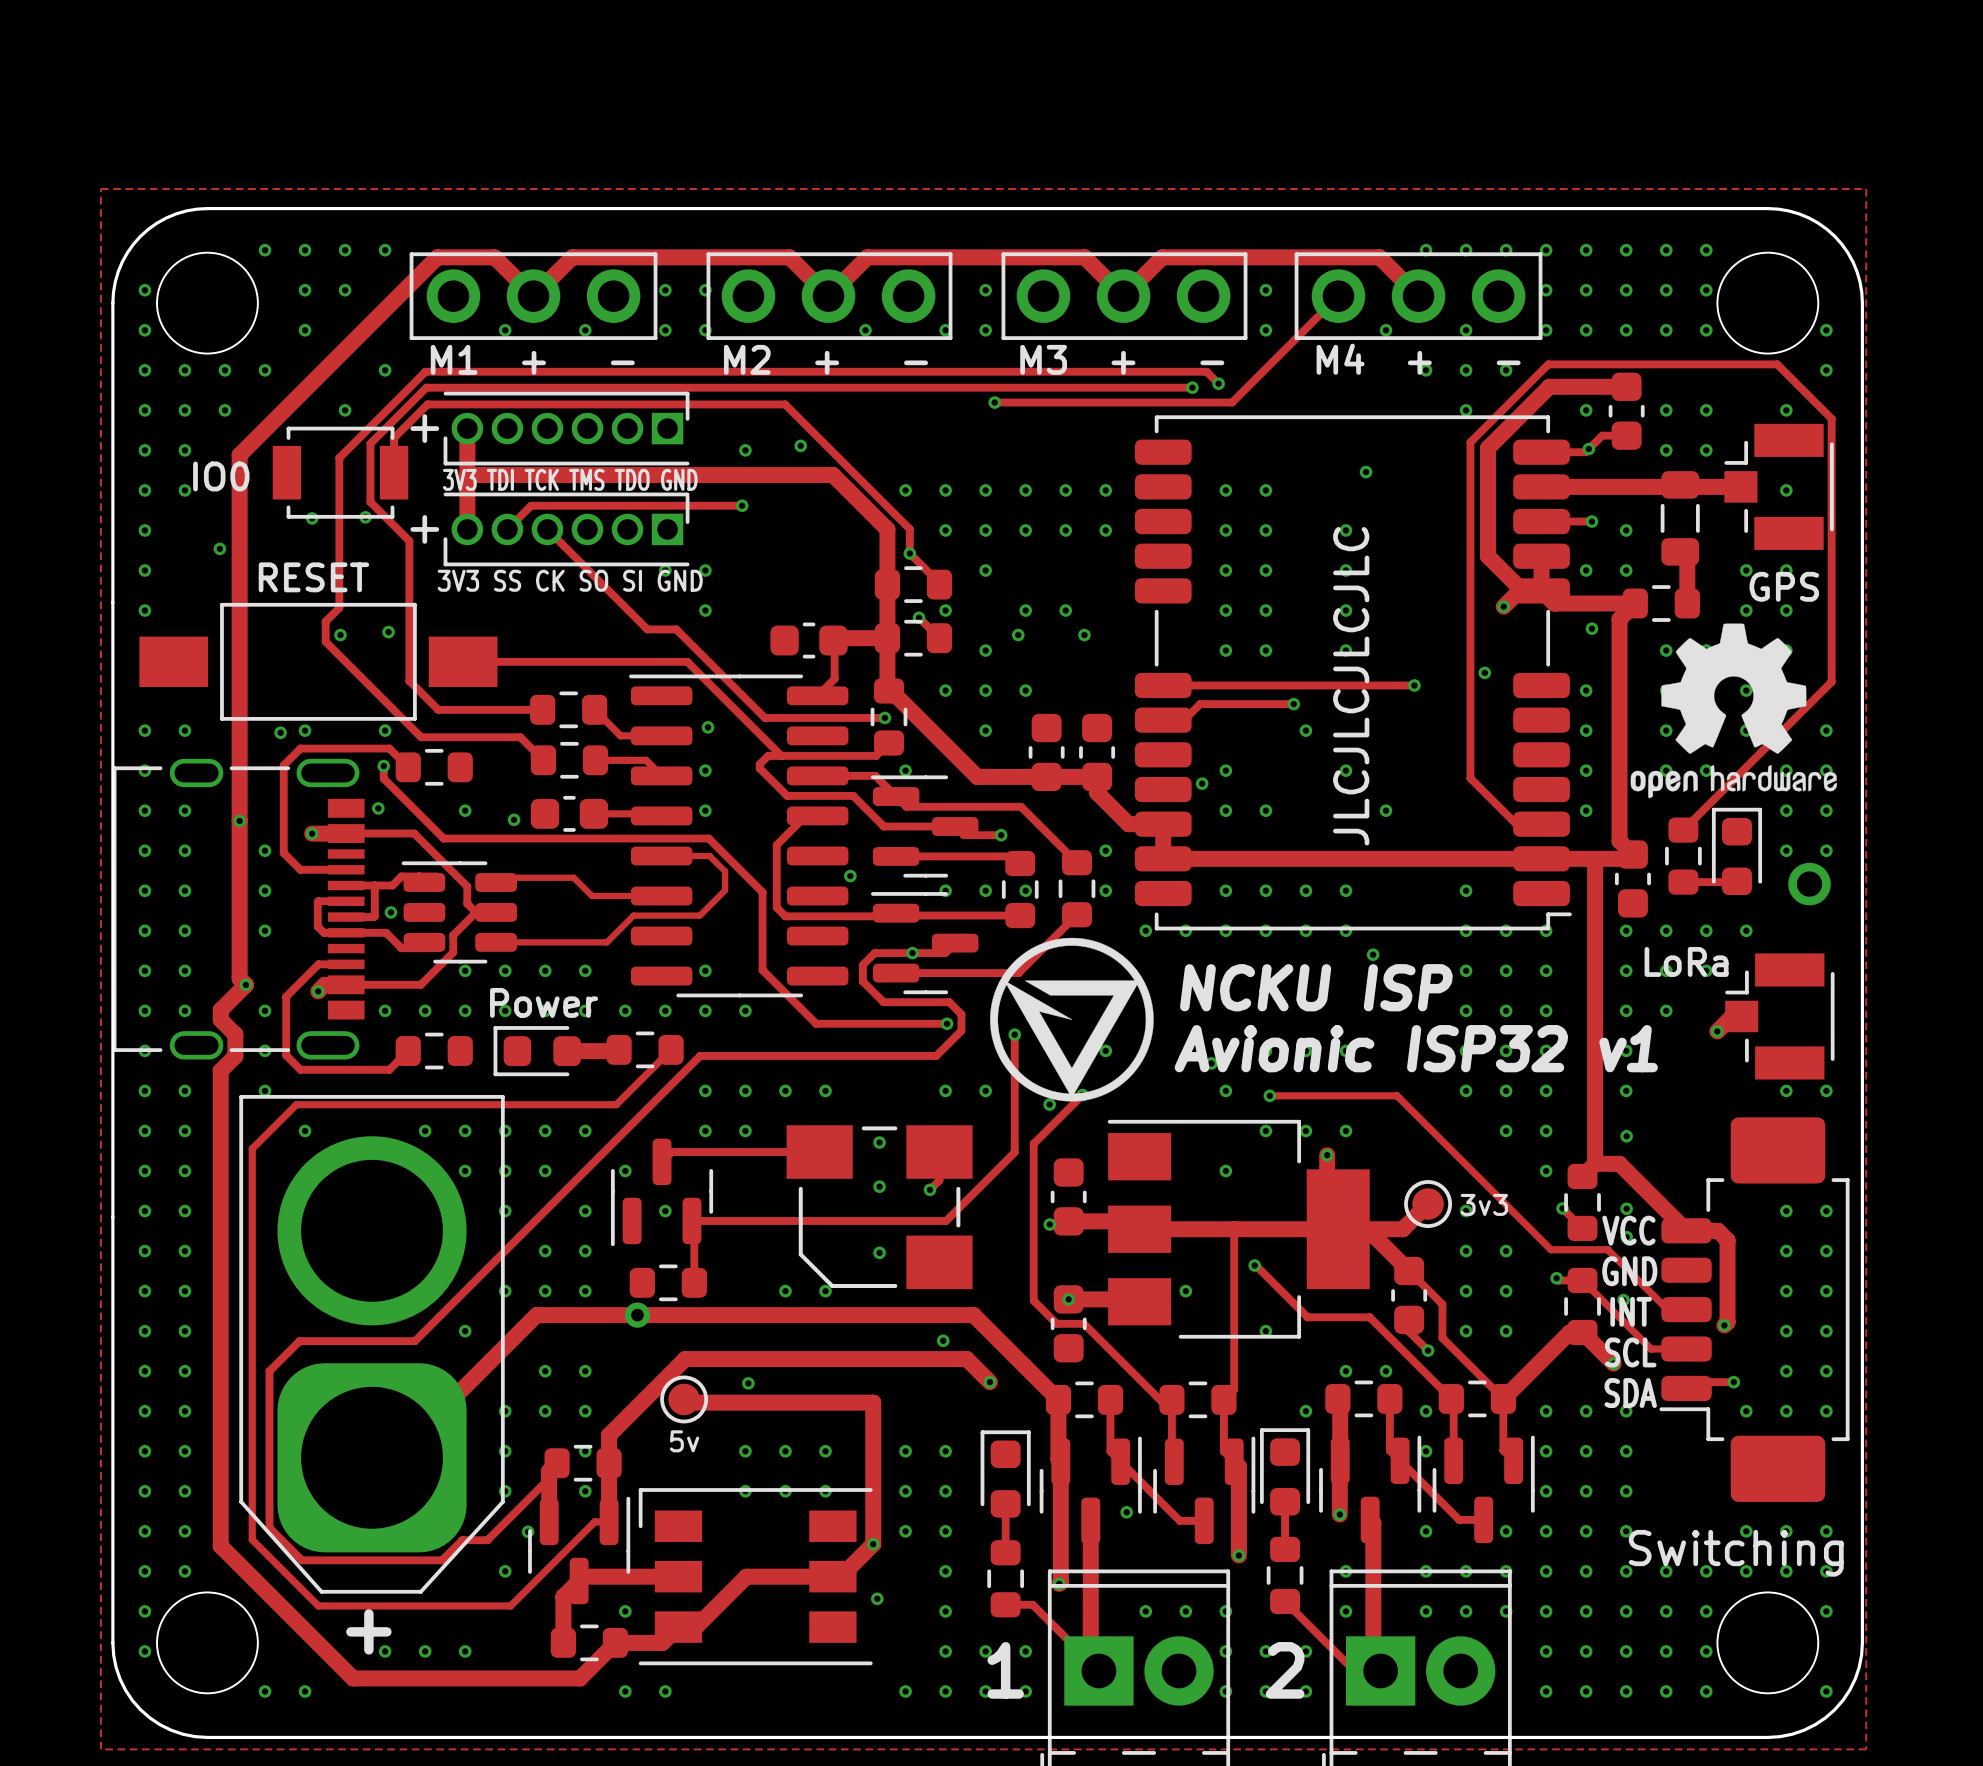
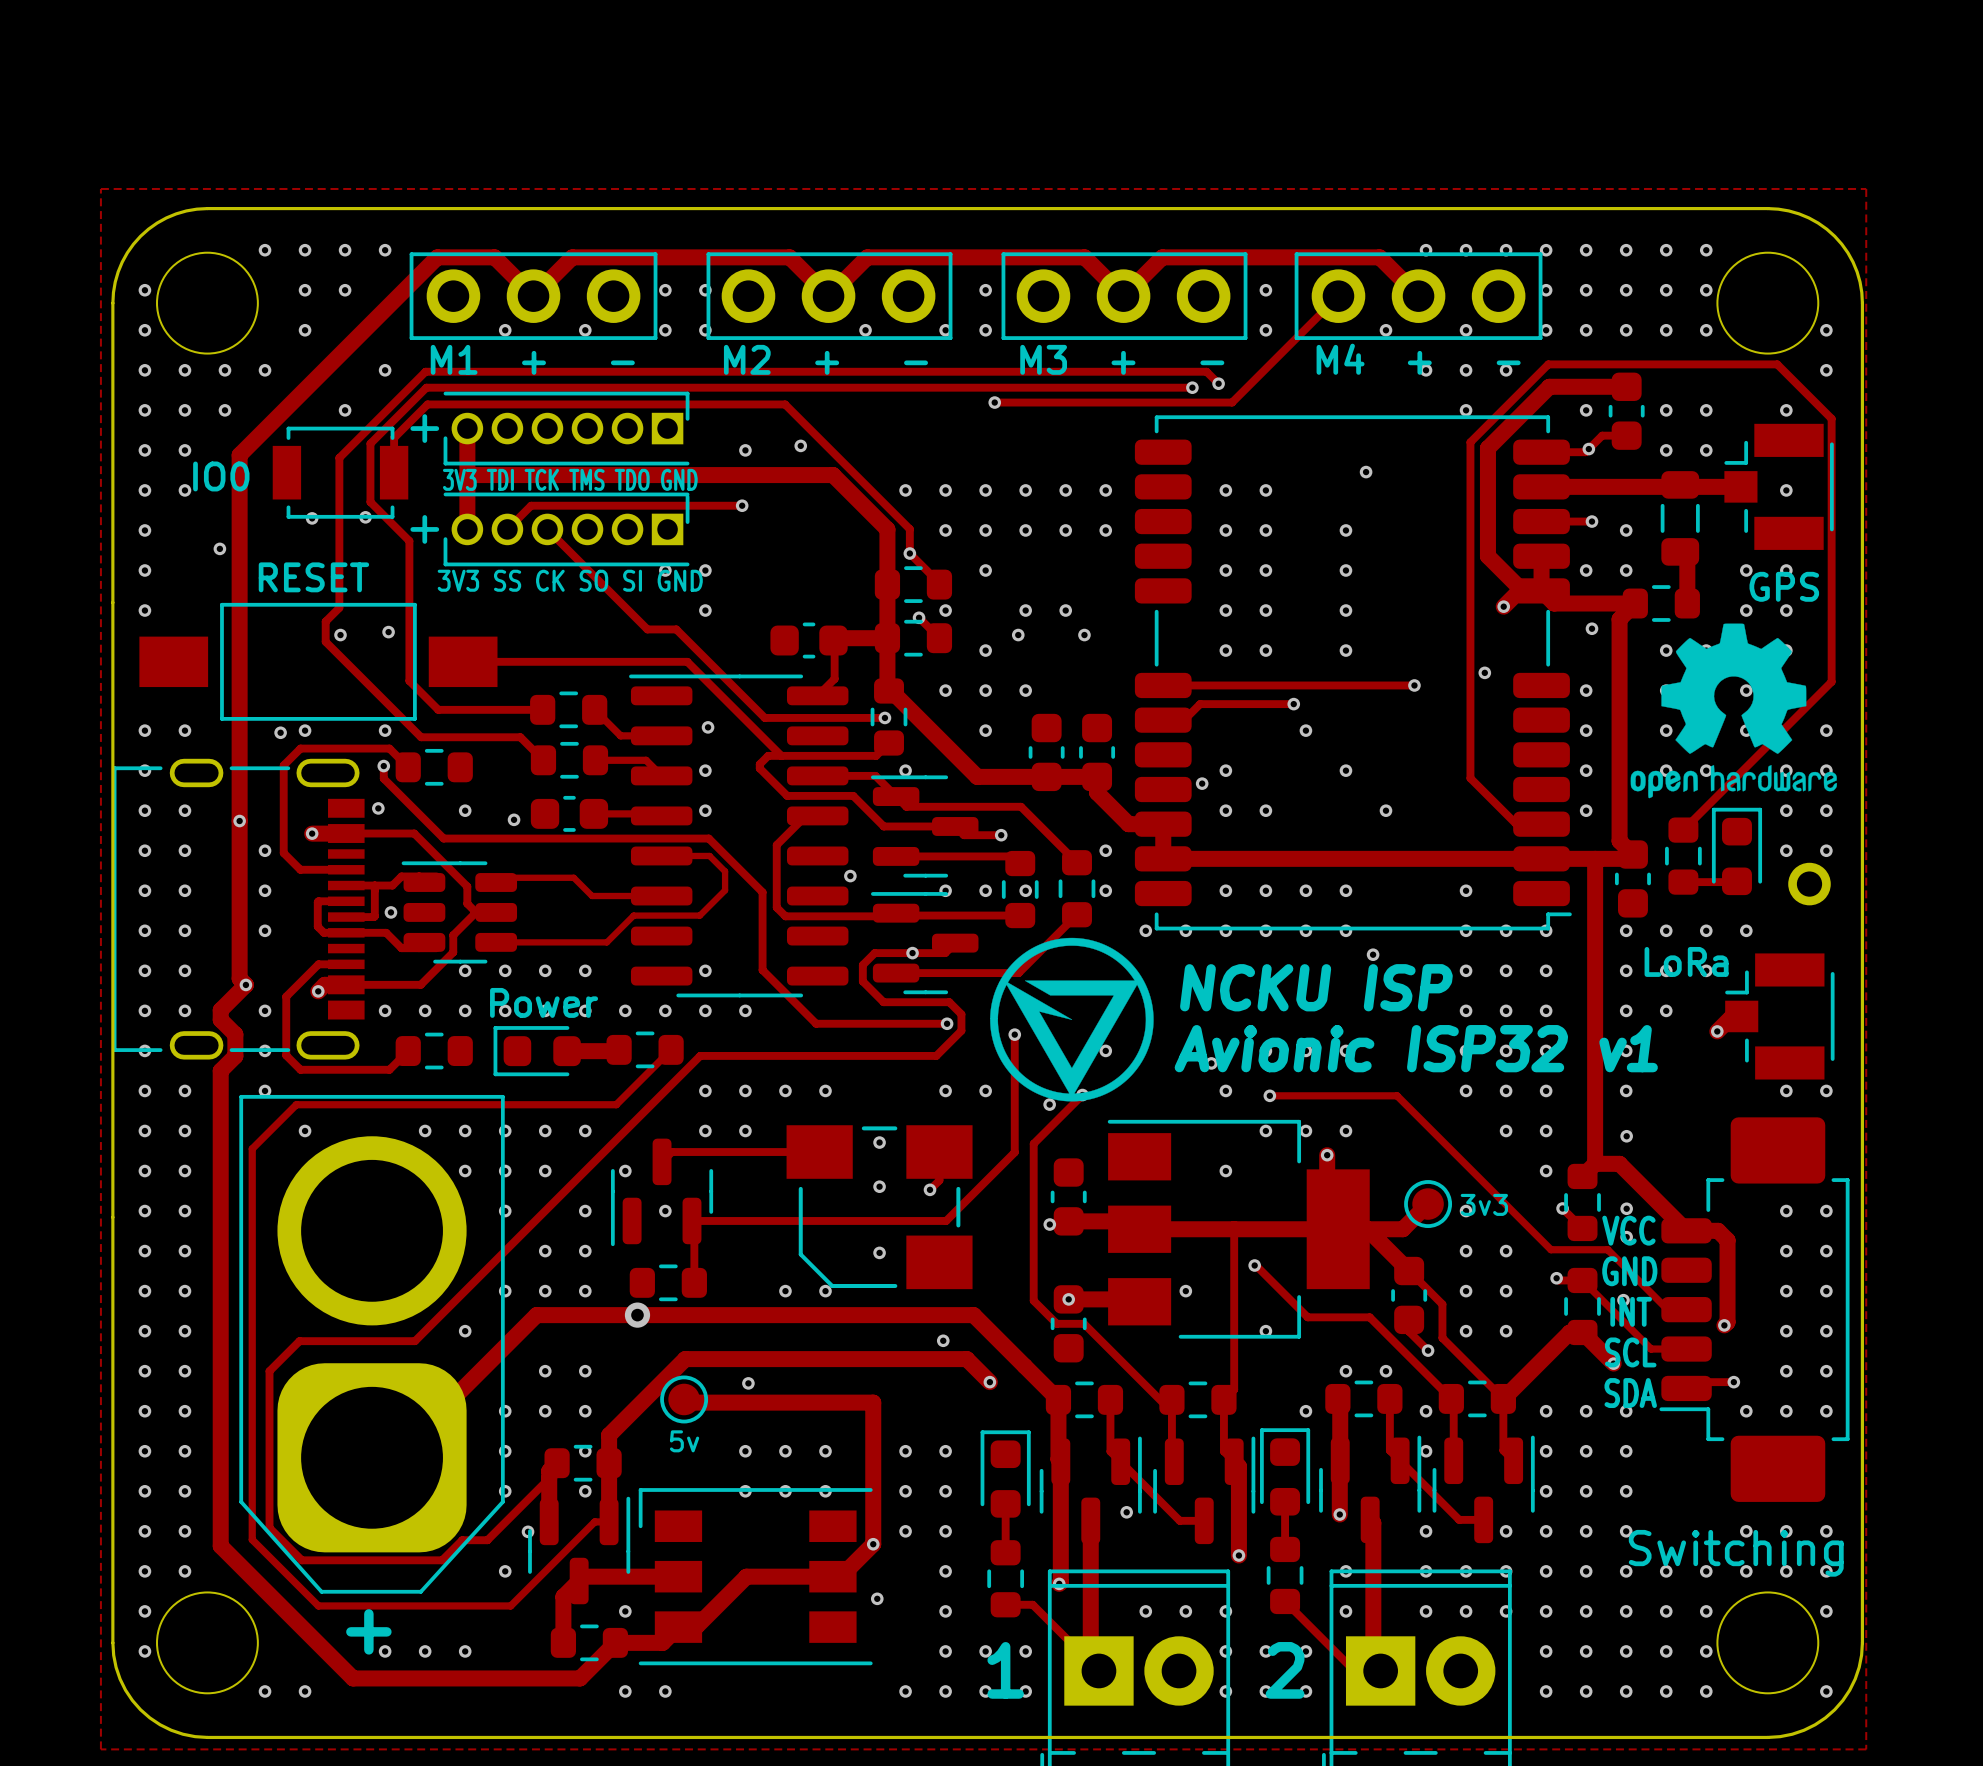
text: JLCJLCJLCJLC (1351, 686) -> none

